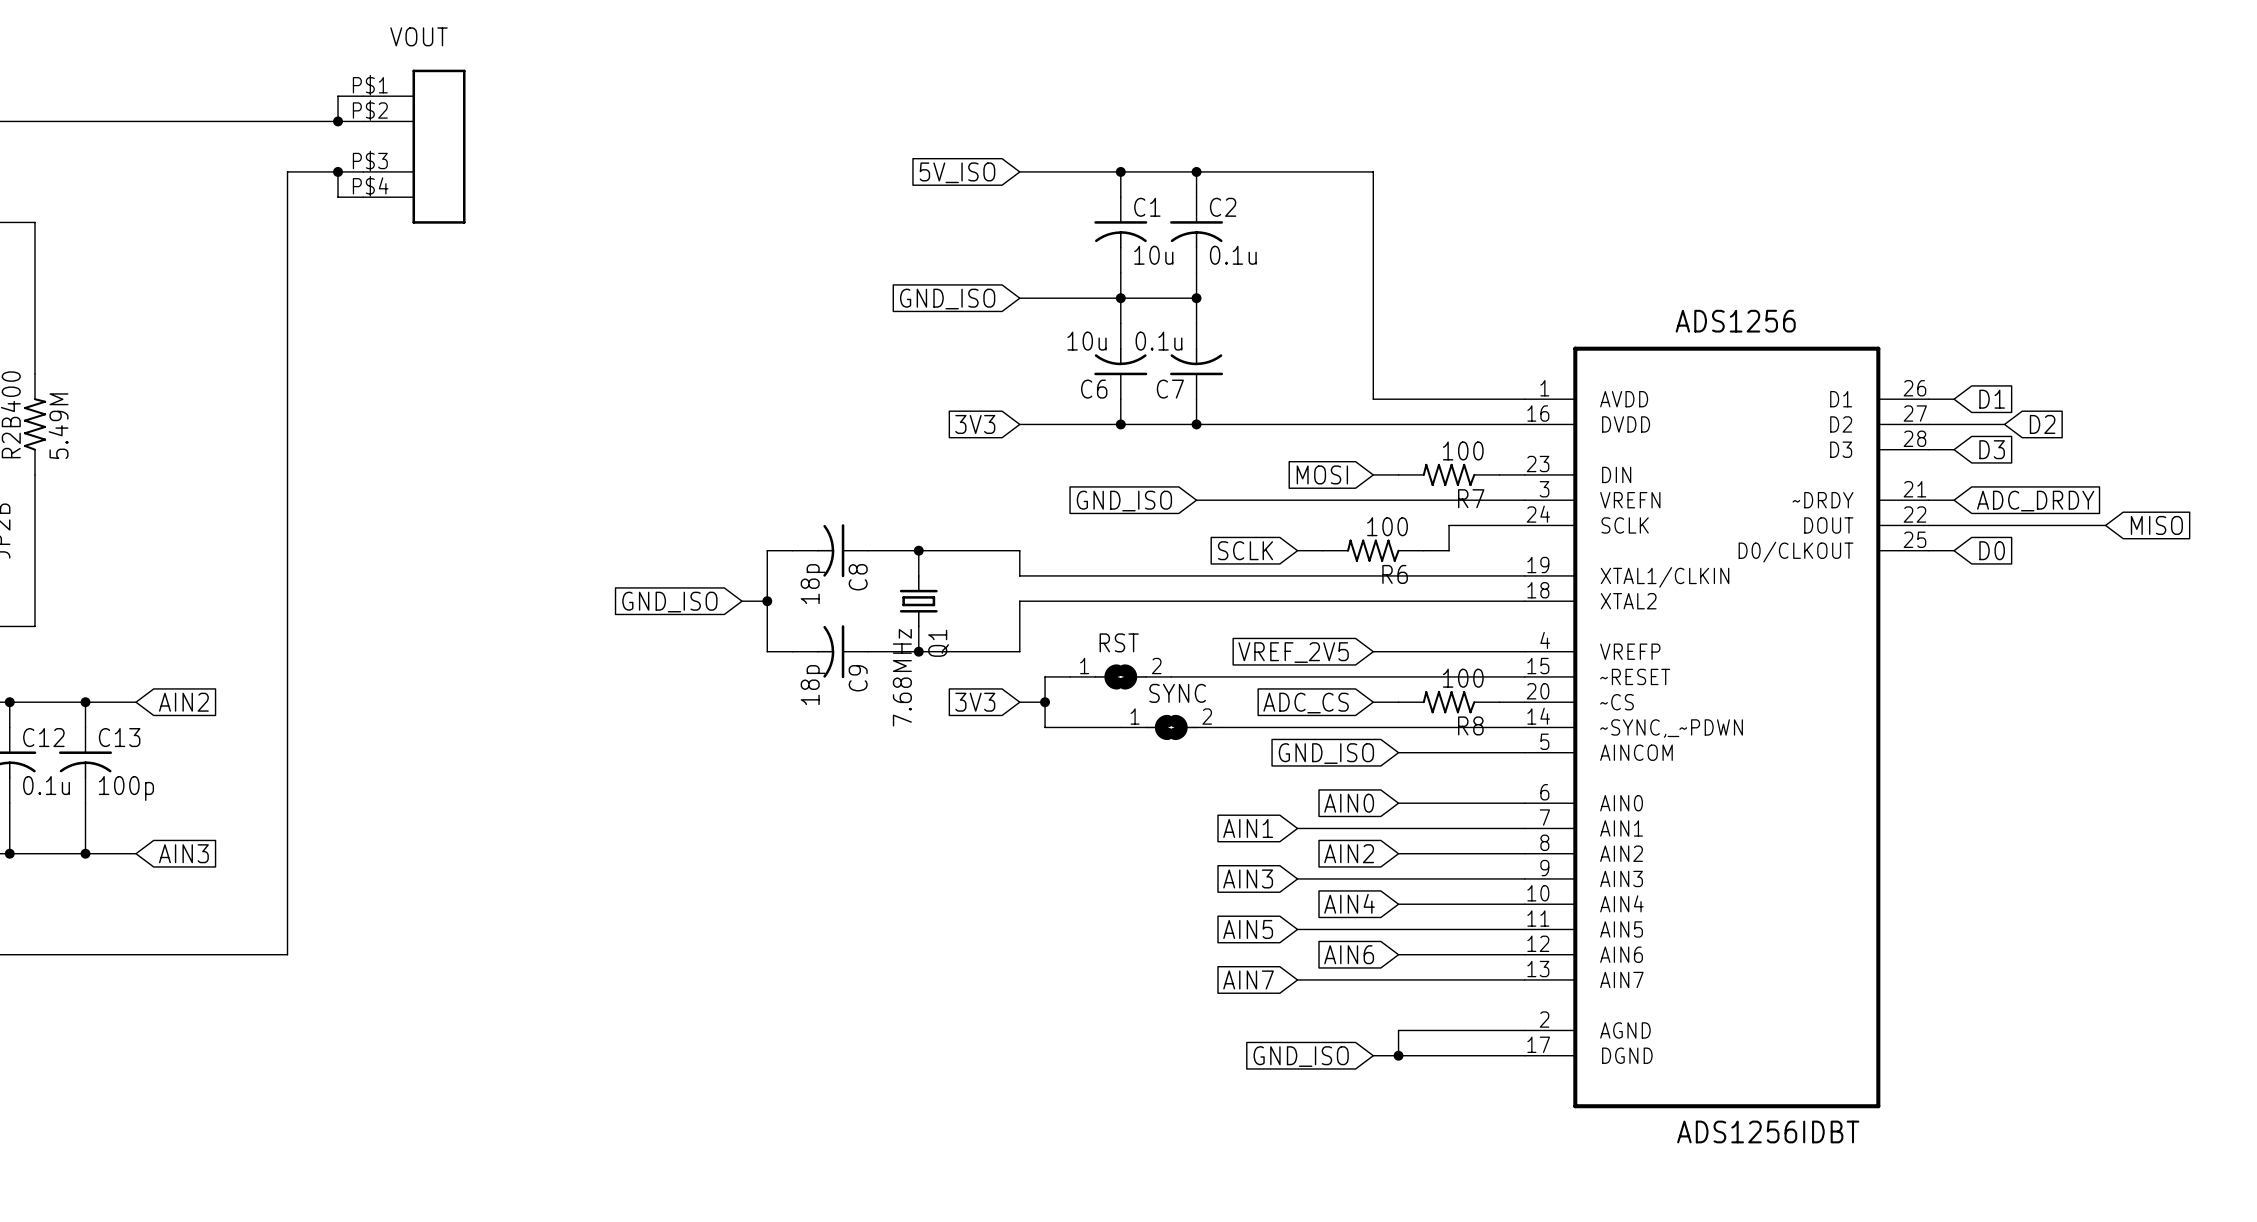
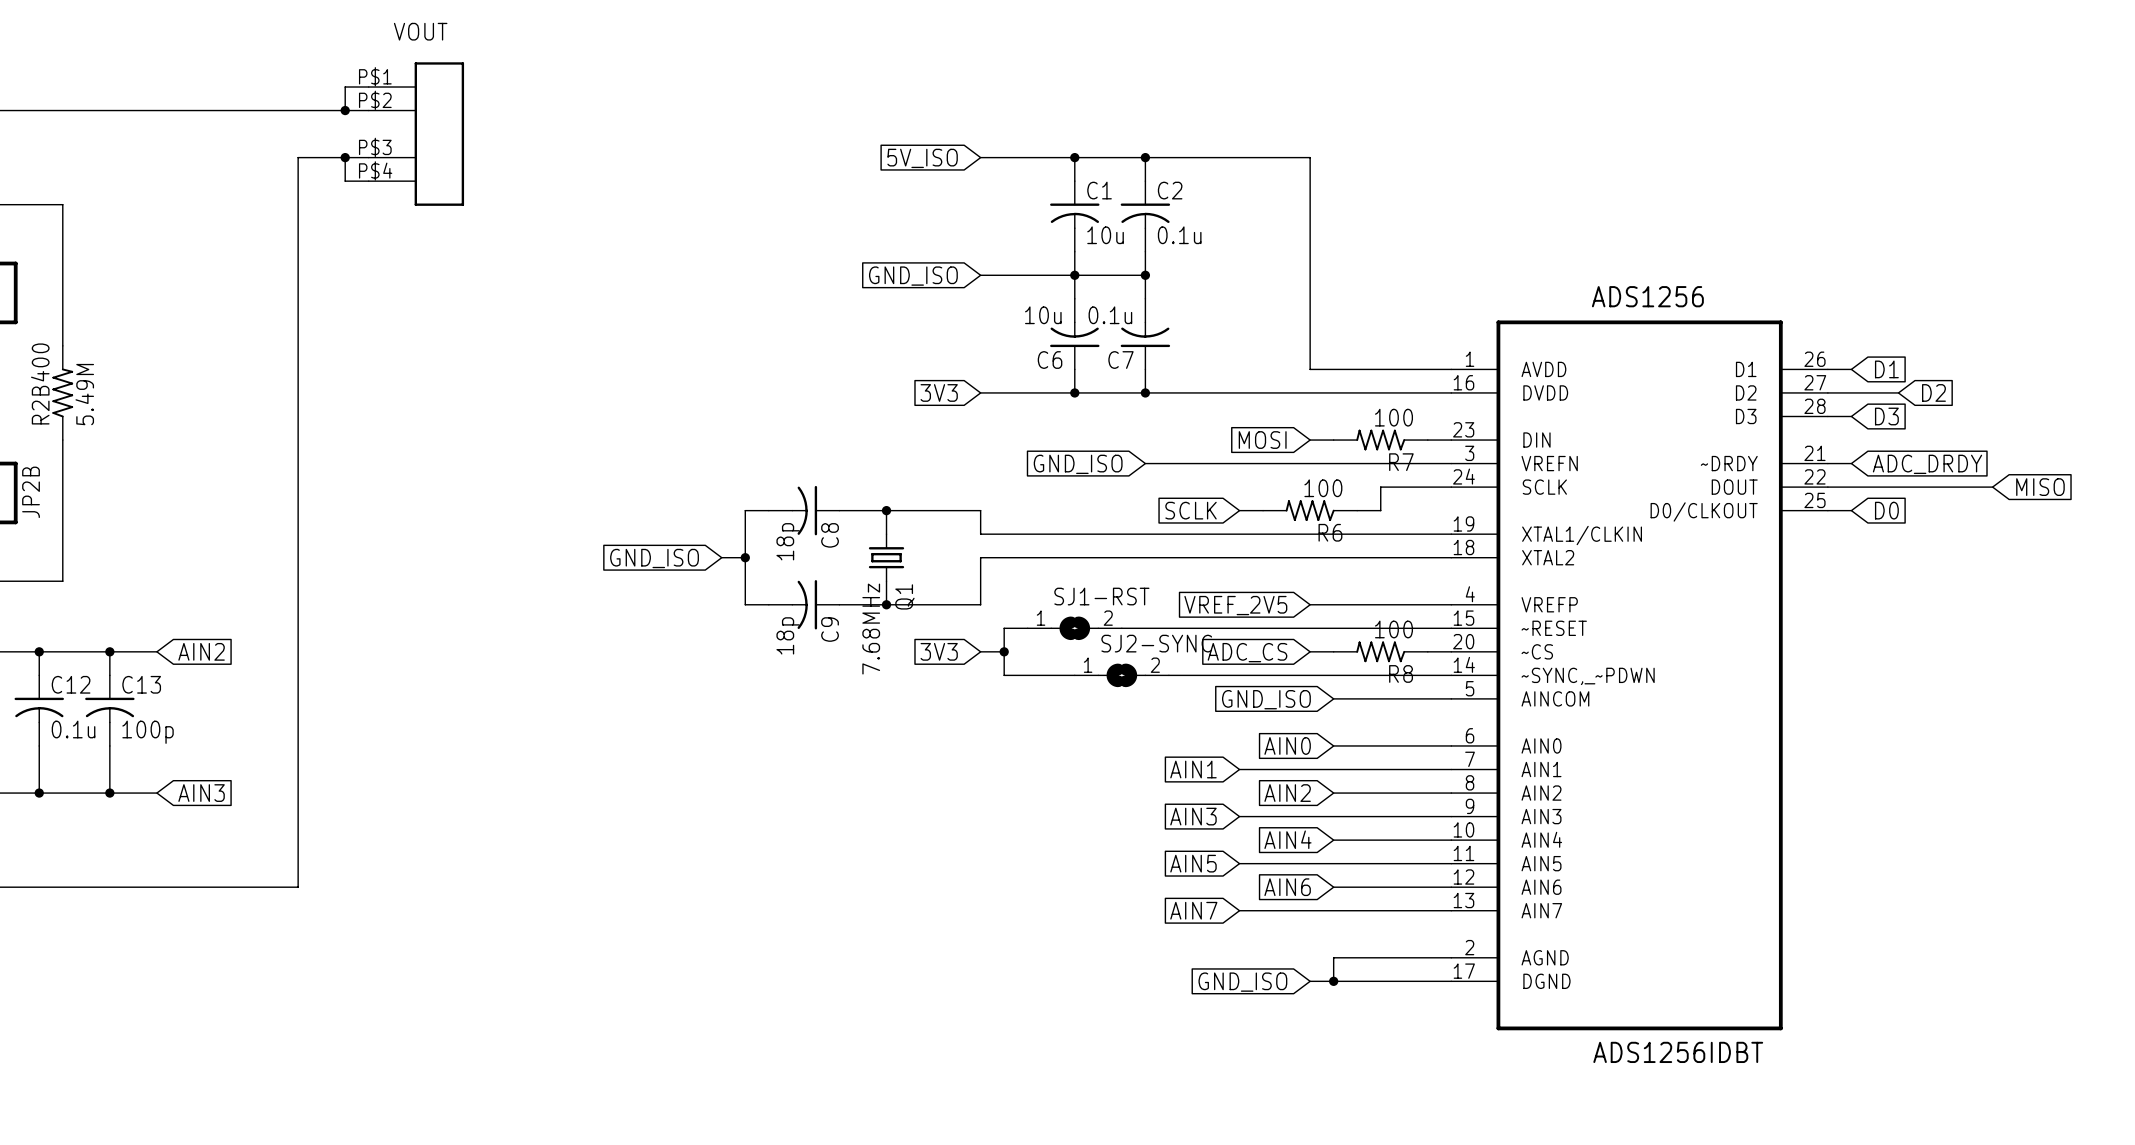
RST name: RST (1119, 642) -> SJ1-RST (1101, 596)
SYNC name: SYNC (1177, 693) -> SJ2-SYNC (1156, 643)

